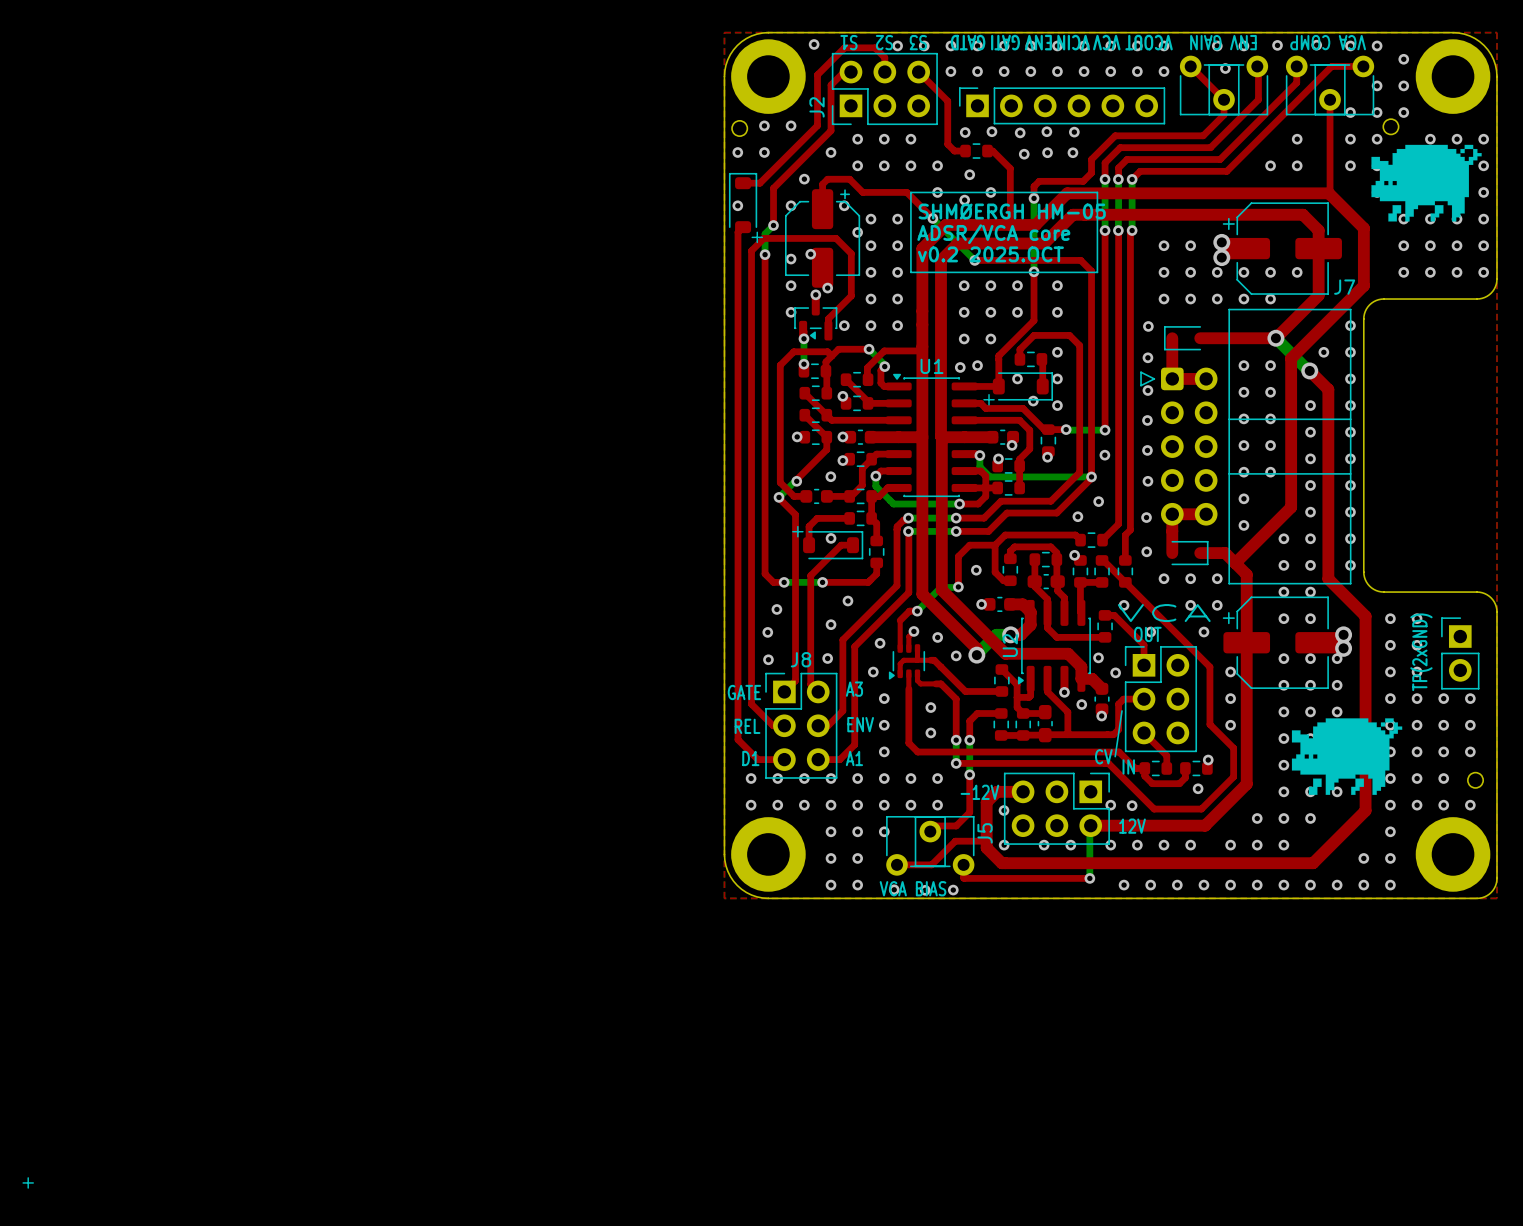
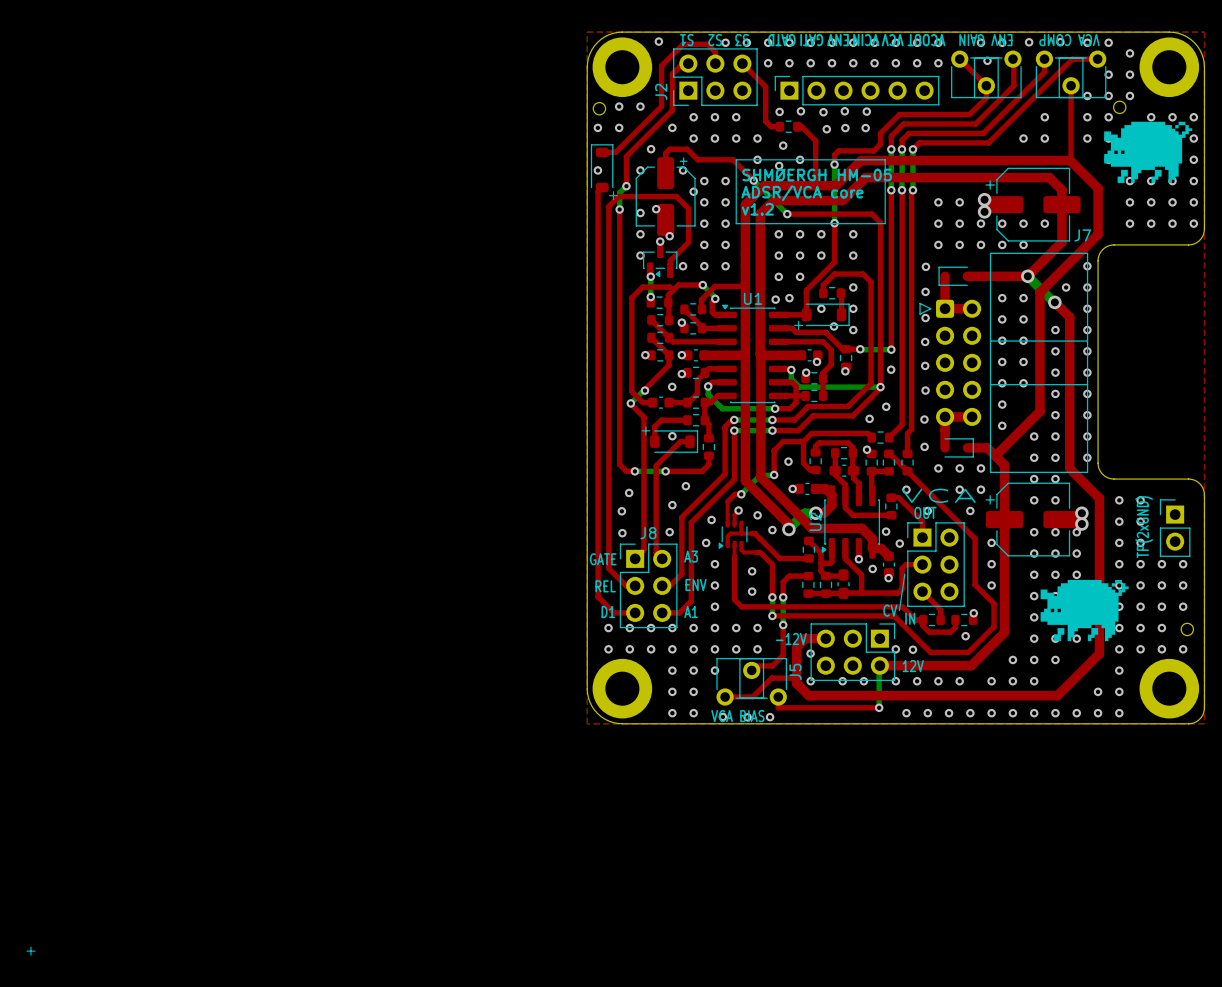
text: v0.2 2025.OCT (990, 254) -> v1.2 (757, 209)

